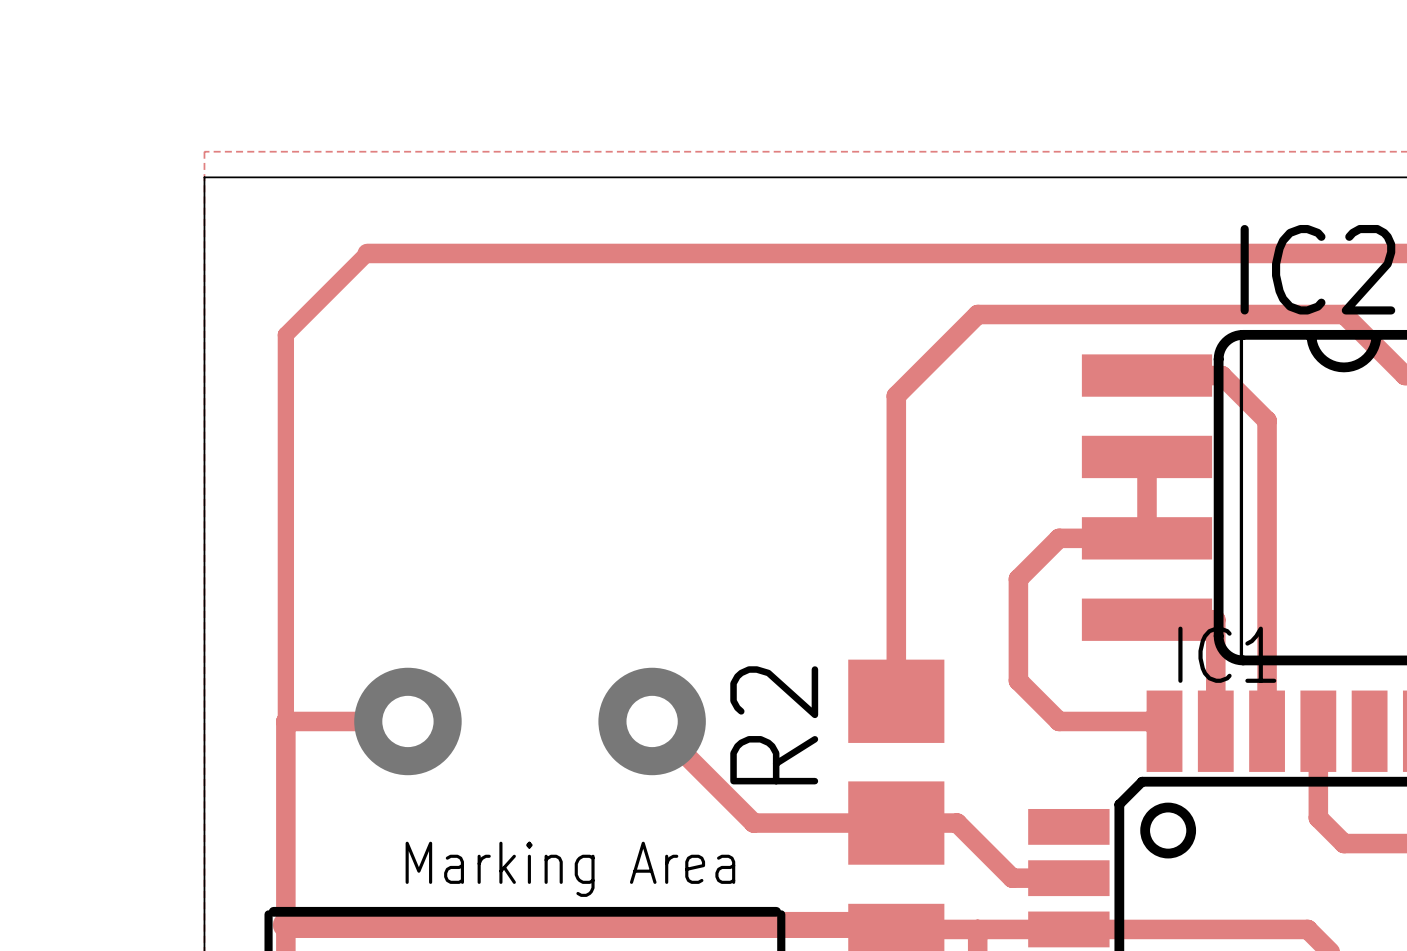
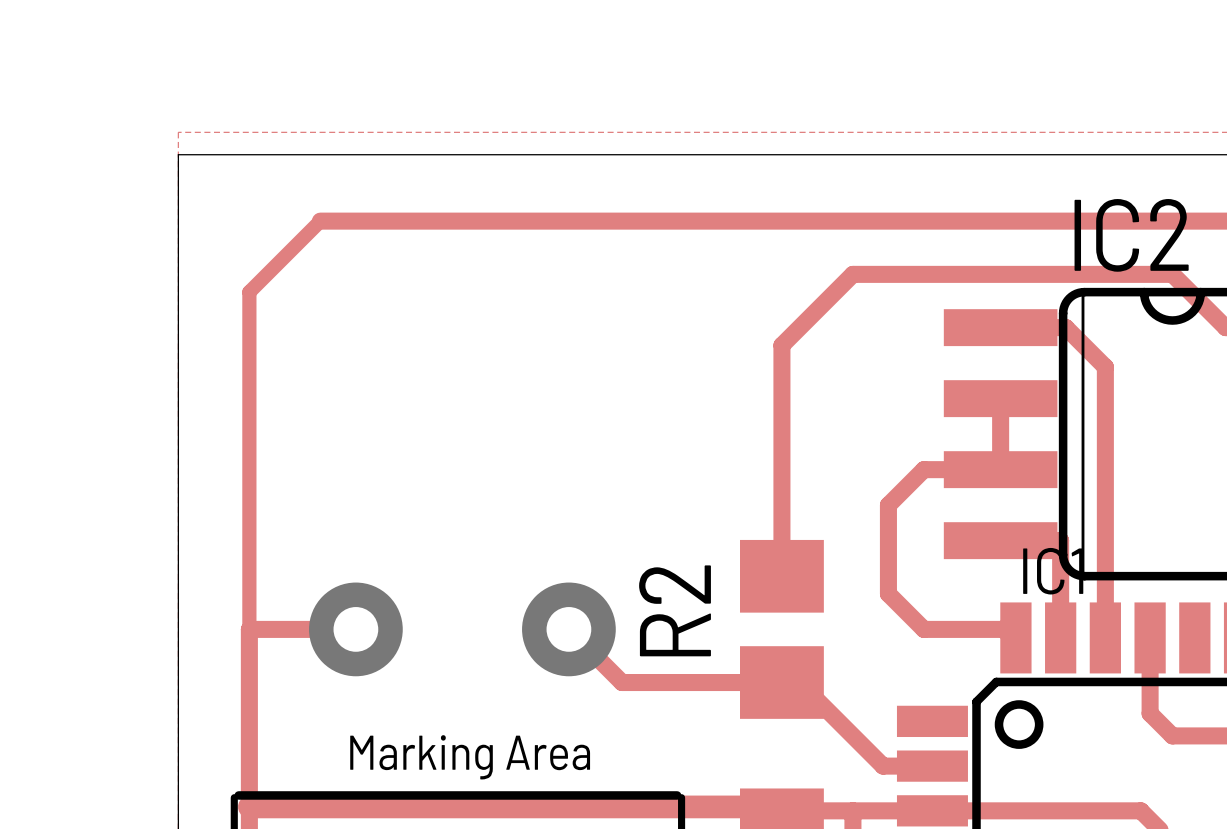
R2 position: (896, 762) -> (781, 629)
track: (713, 782) (753, 823) (957, 823) -> (622, 682) (799, 682) (835, 718)

